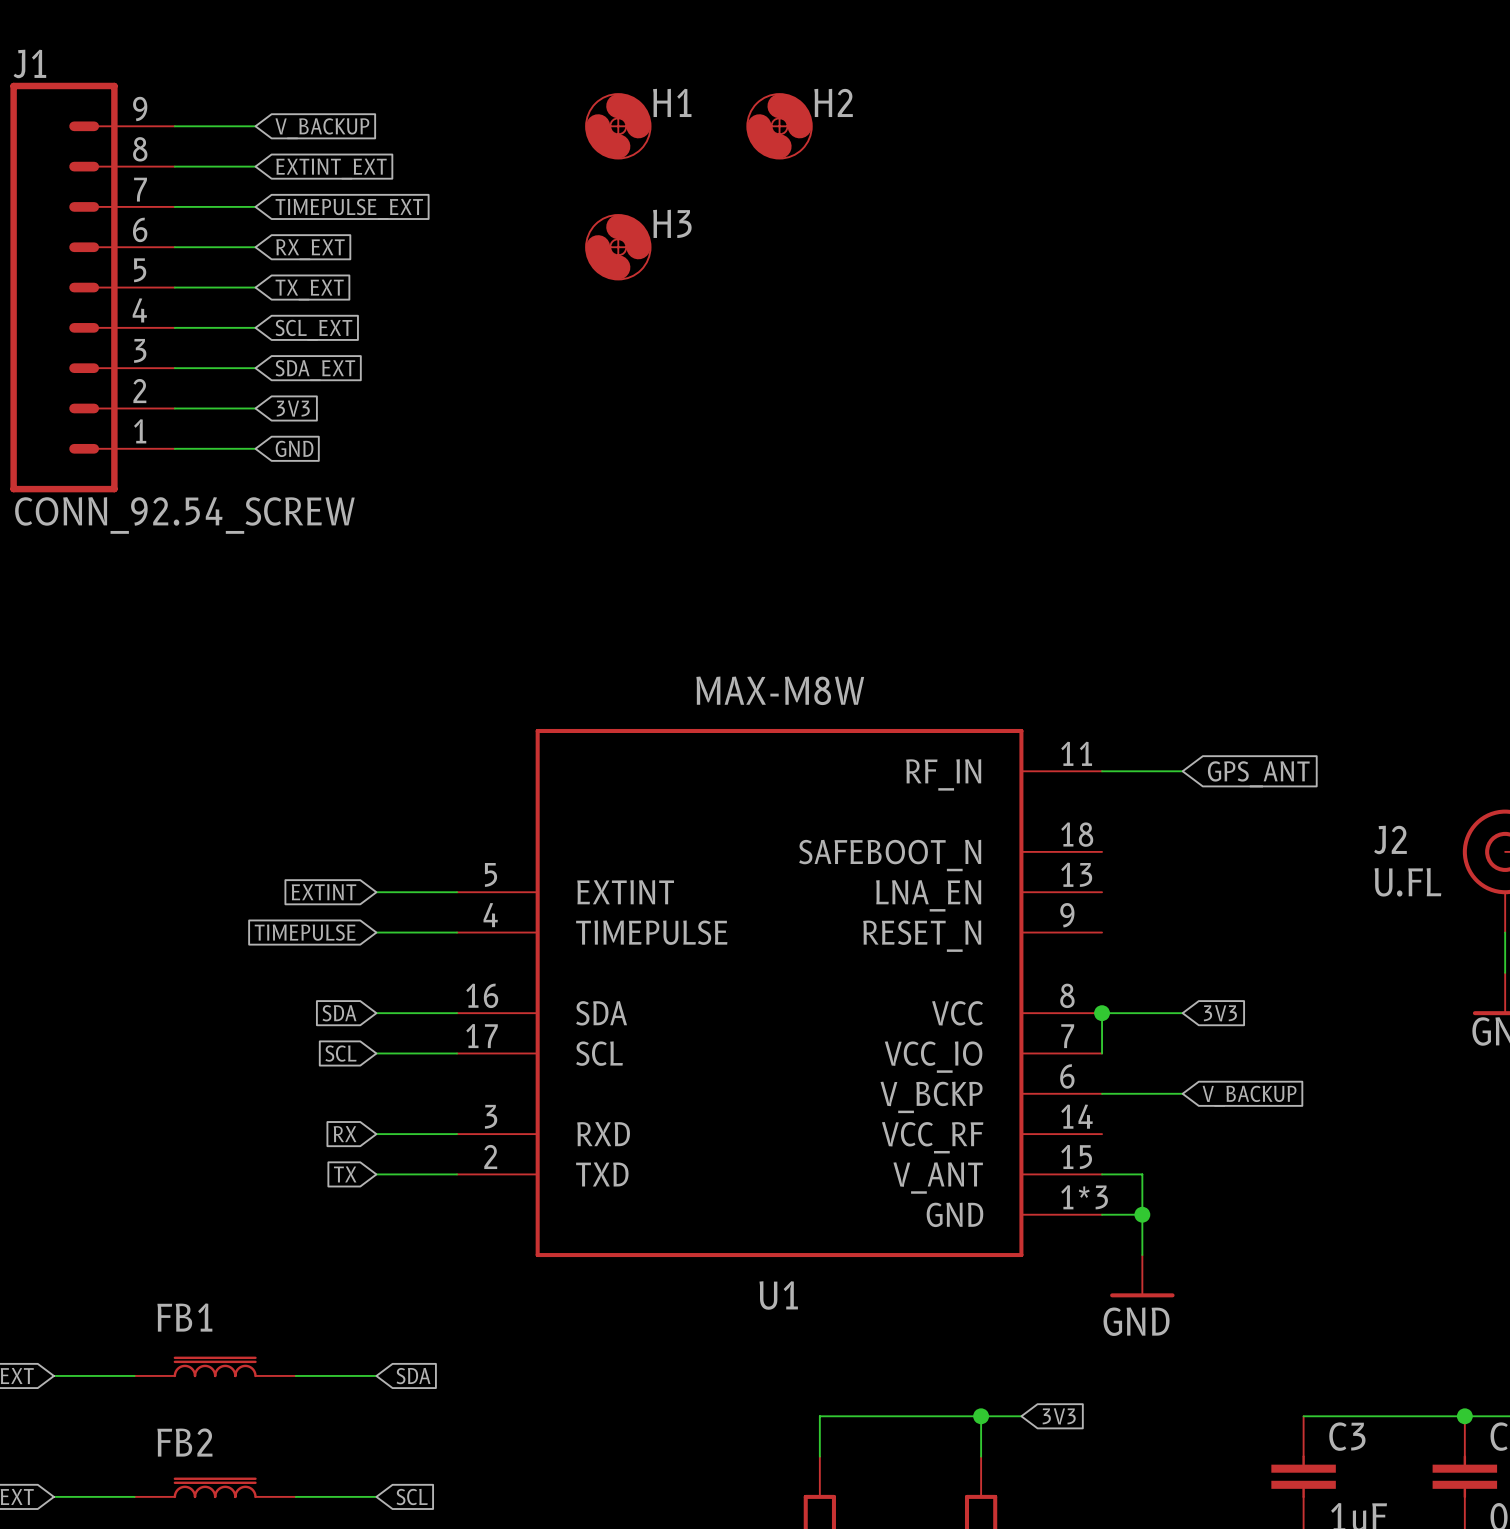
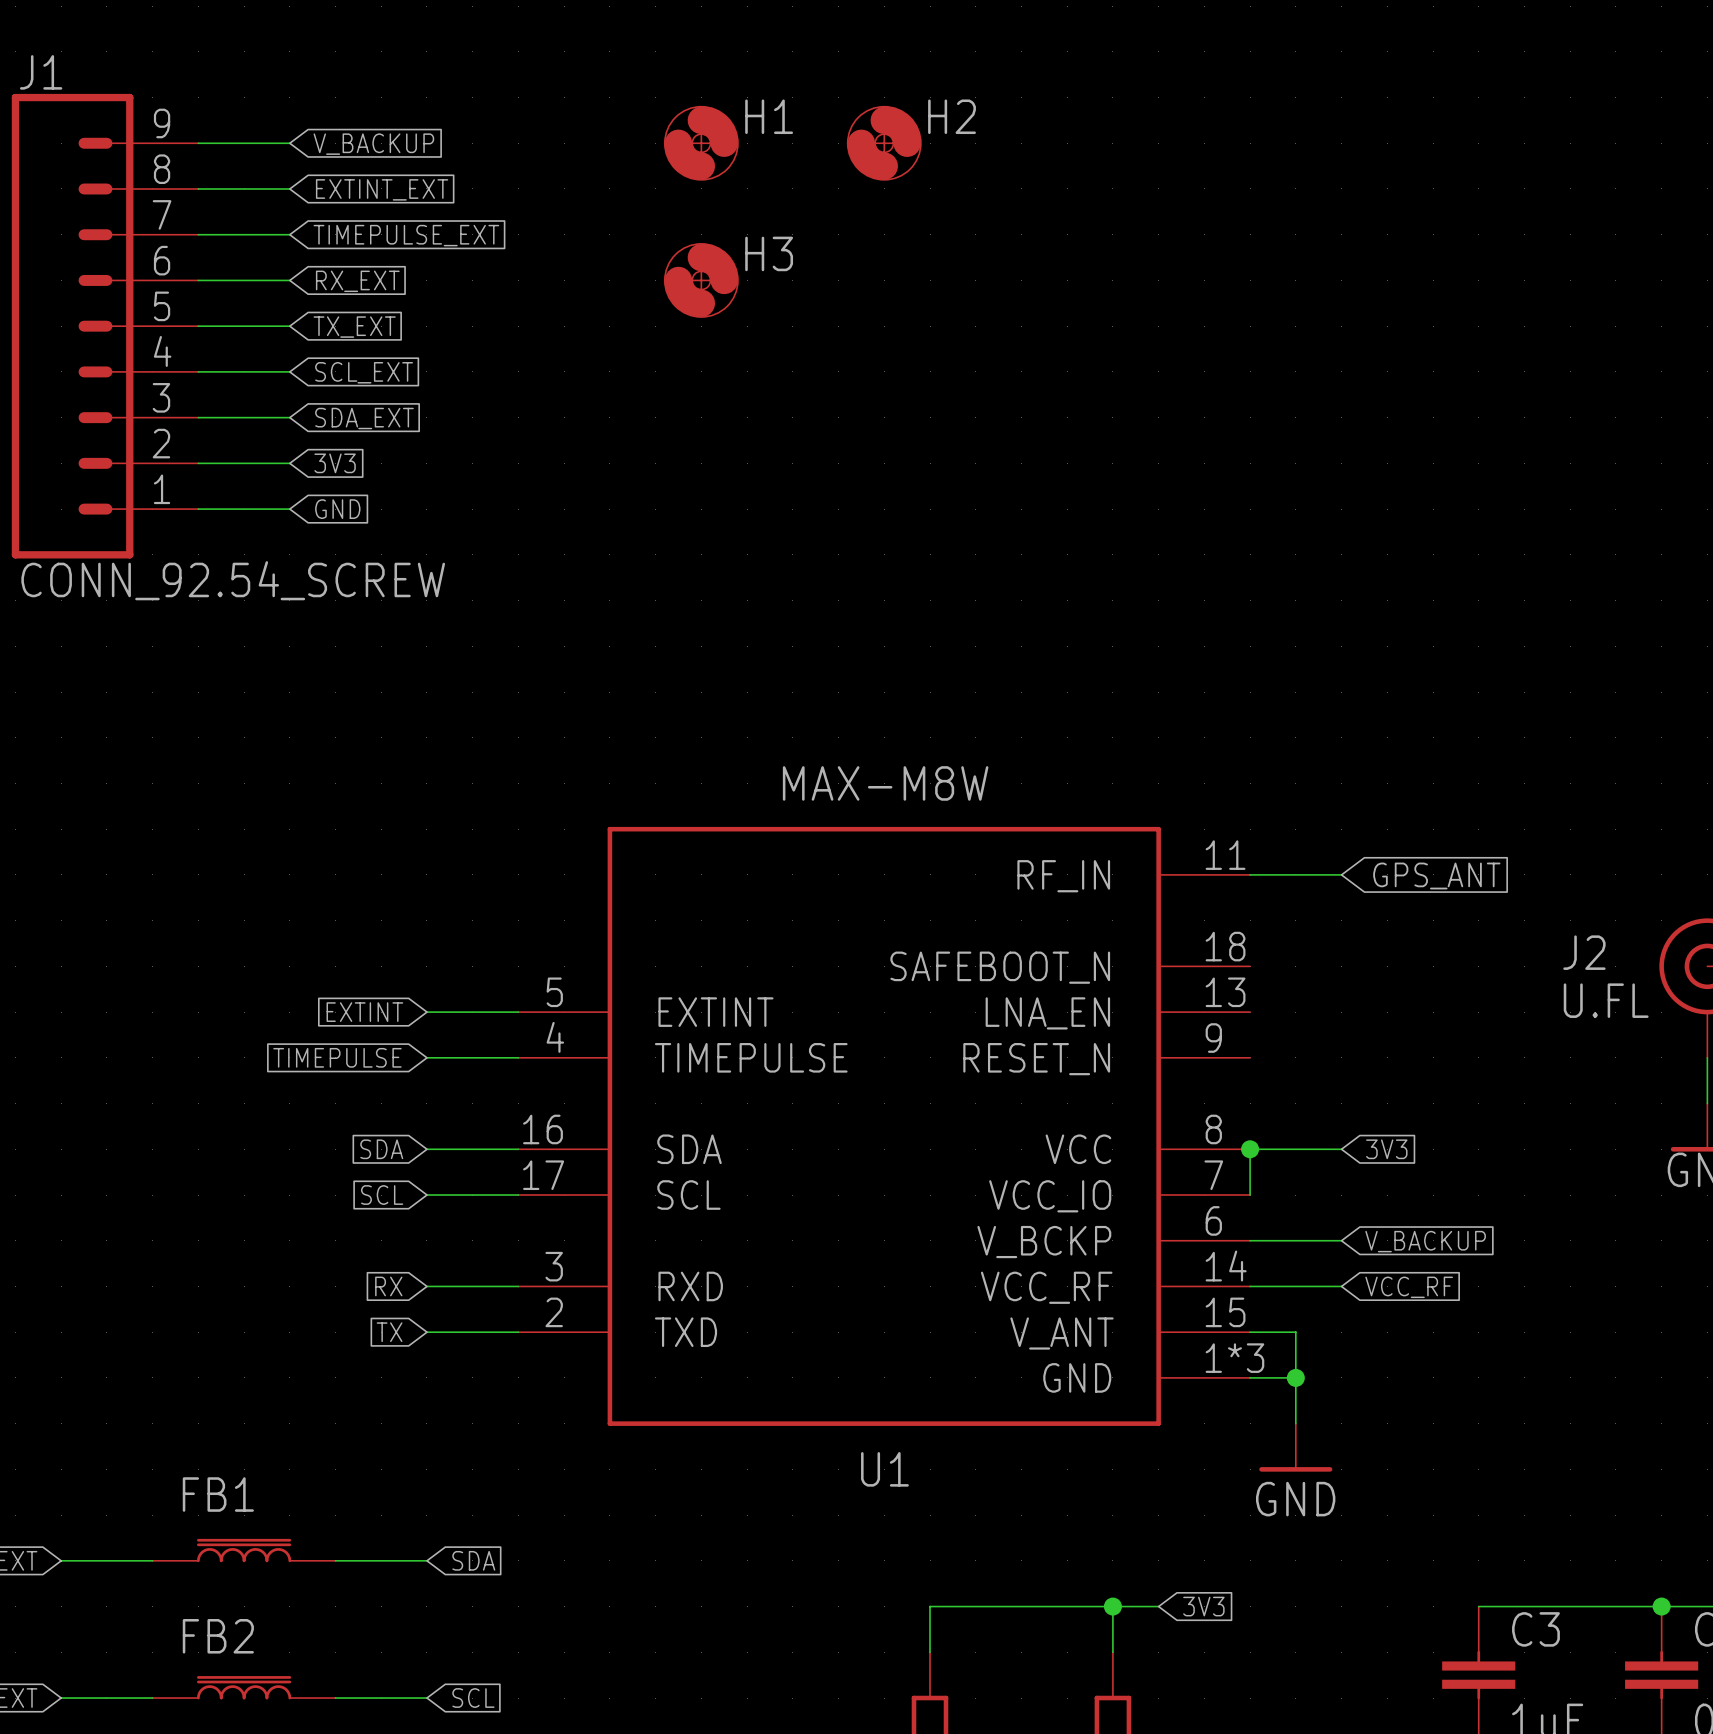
wire: none -> (1250, 1286) (1341, 1286)
global label: none -> VCC_RF (1409, 1287)

